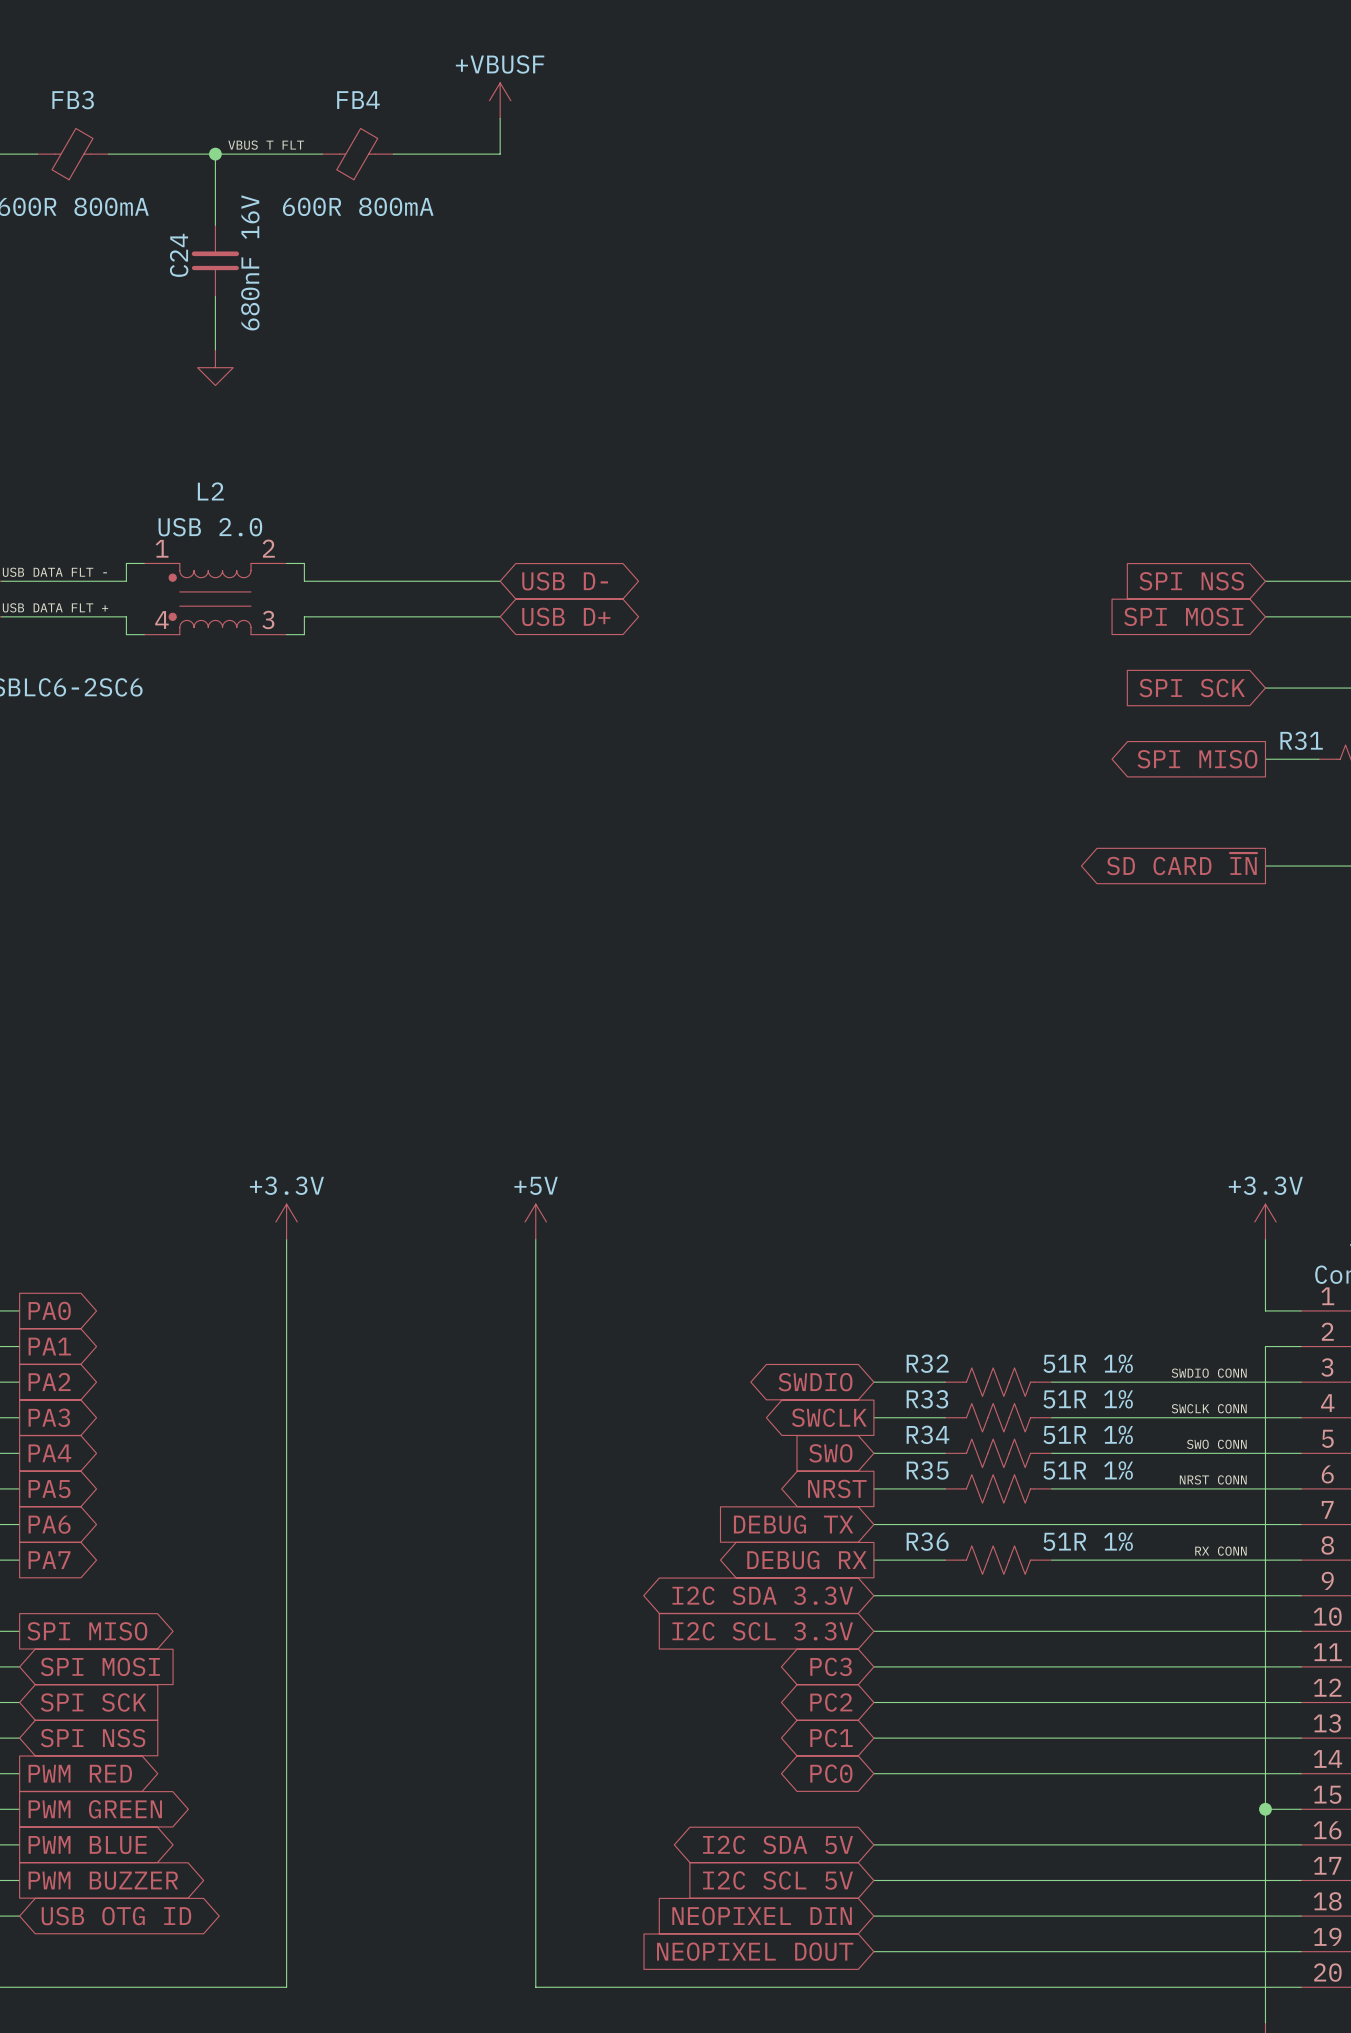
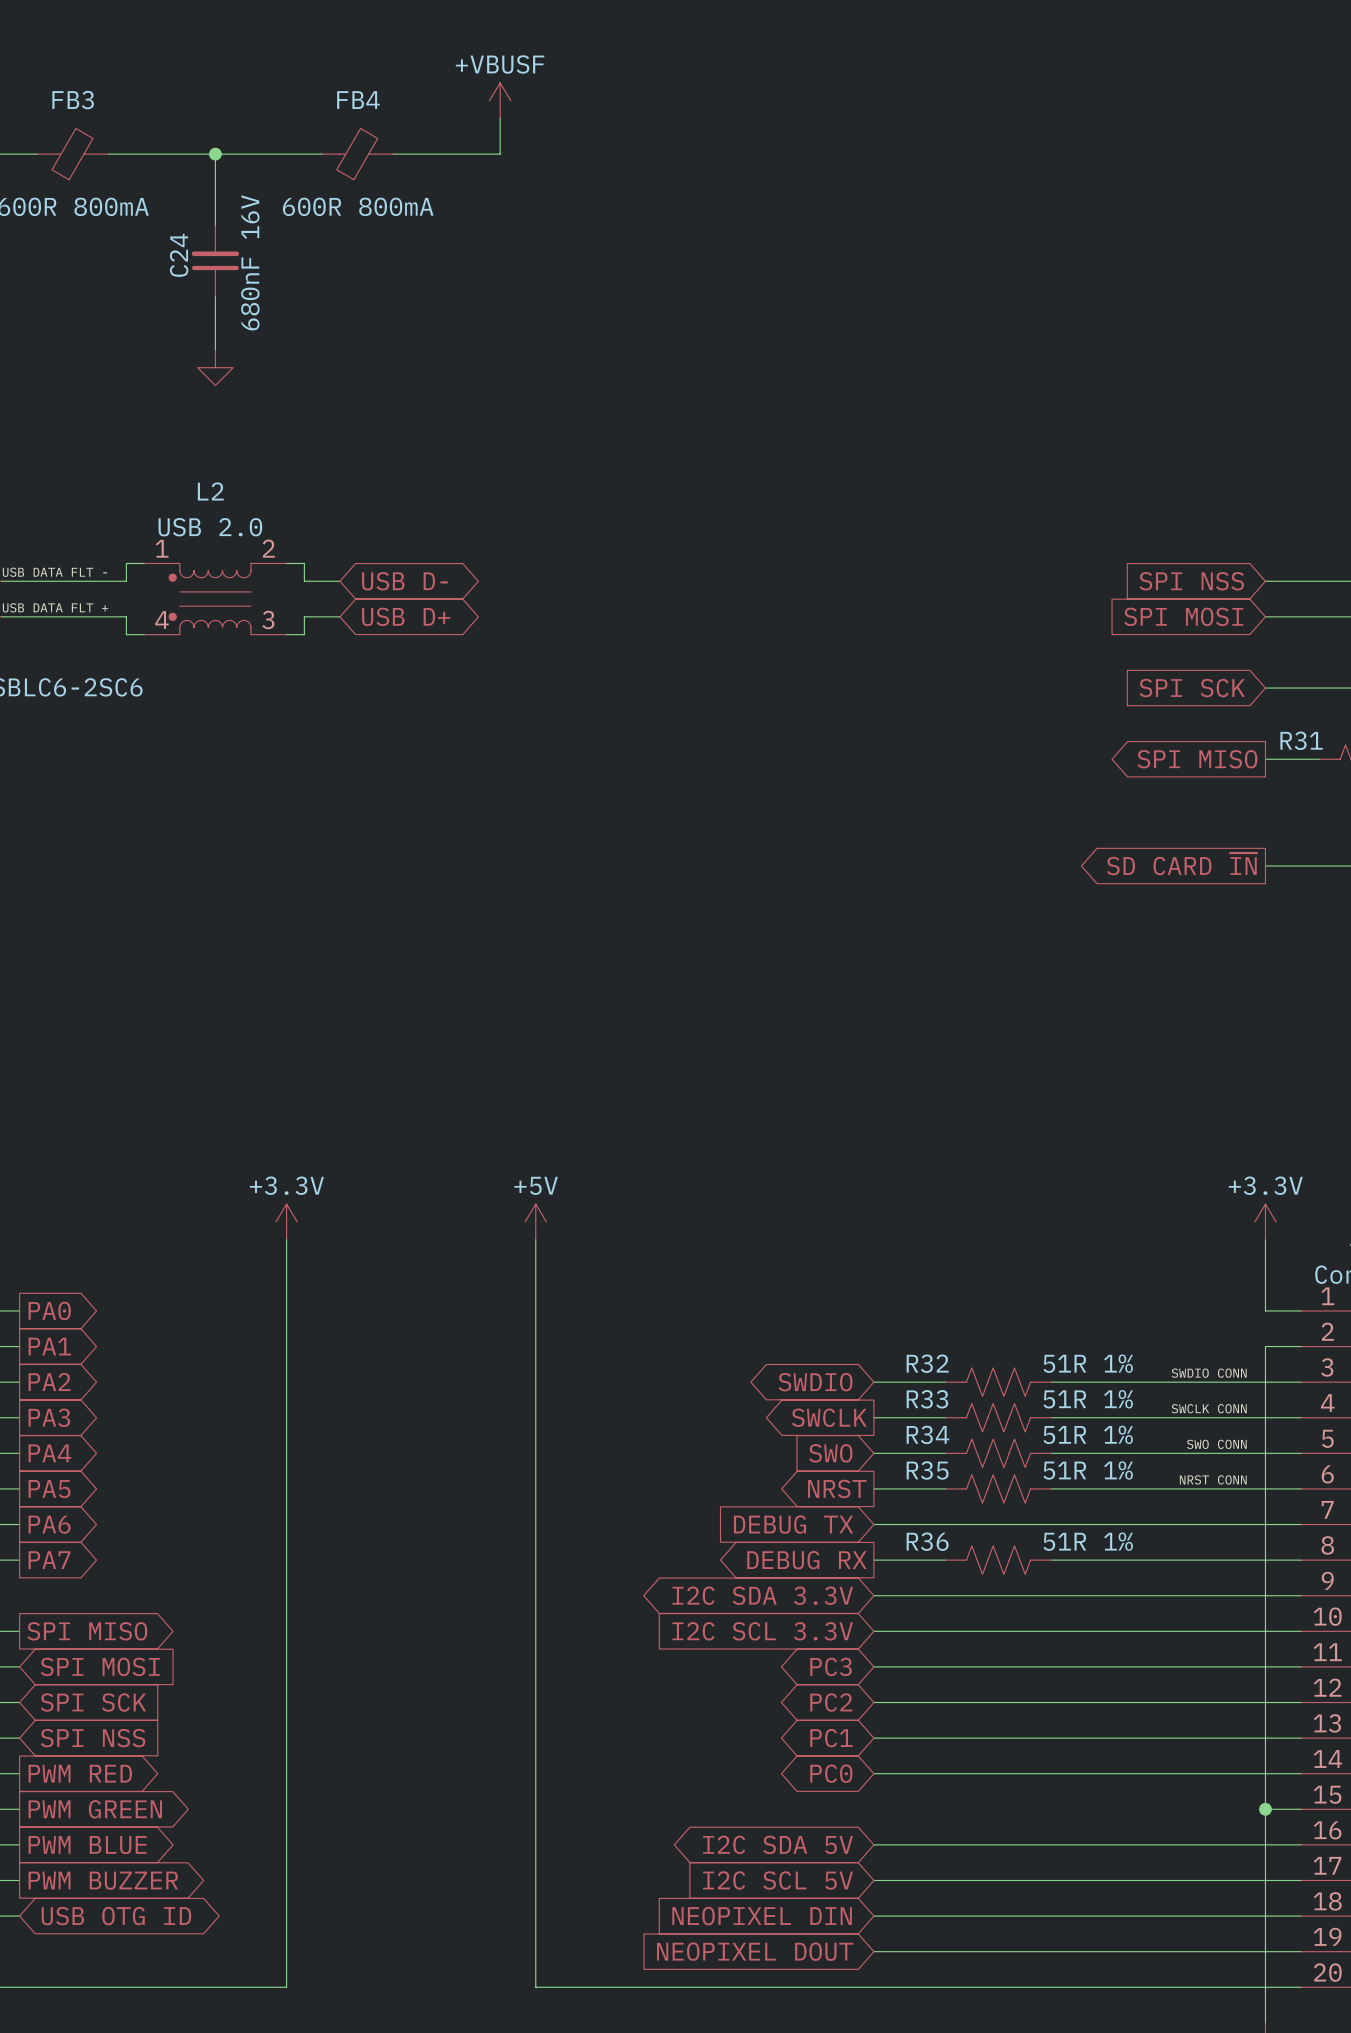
label: VBUS T FLT (266, 145) -> none
wire: (339, 581) (500, 581) -> none
global label position: USB D- (565, 581) -> USB D- (404, 581)
wire: (339, 616) (500, 616) -> none
global label position: USB D+ (566, 616) -> USB D+ (406, 616)
label: RX CONN (1220, 1551) -> none

